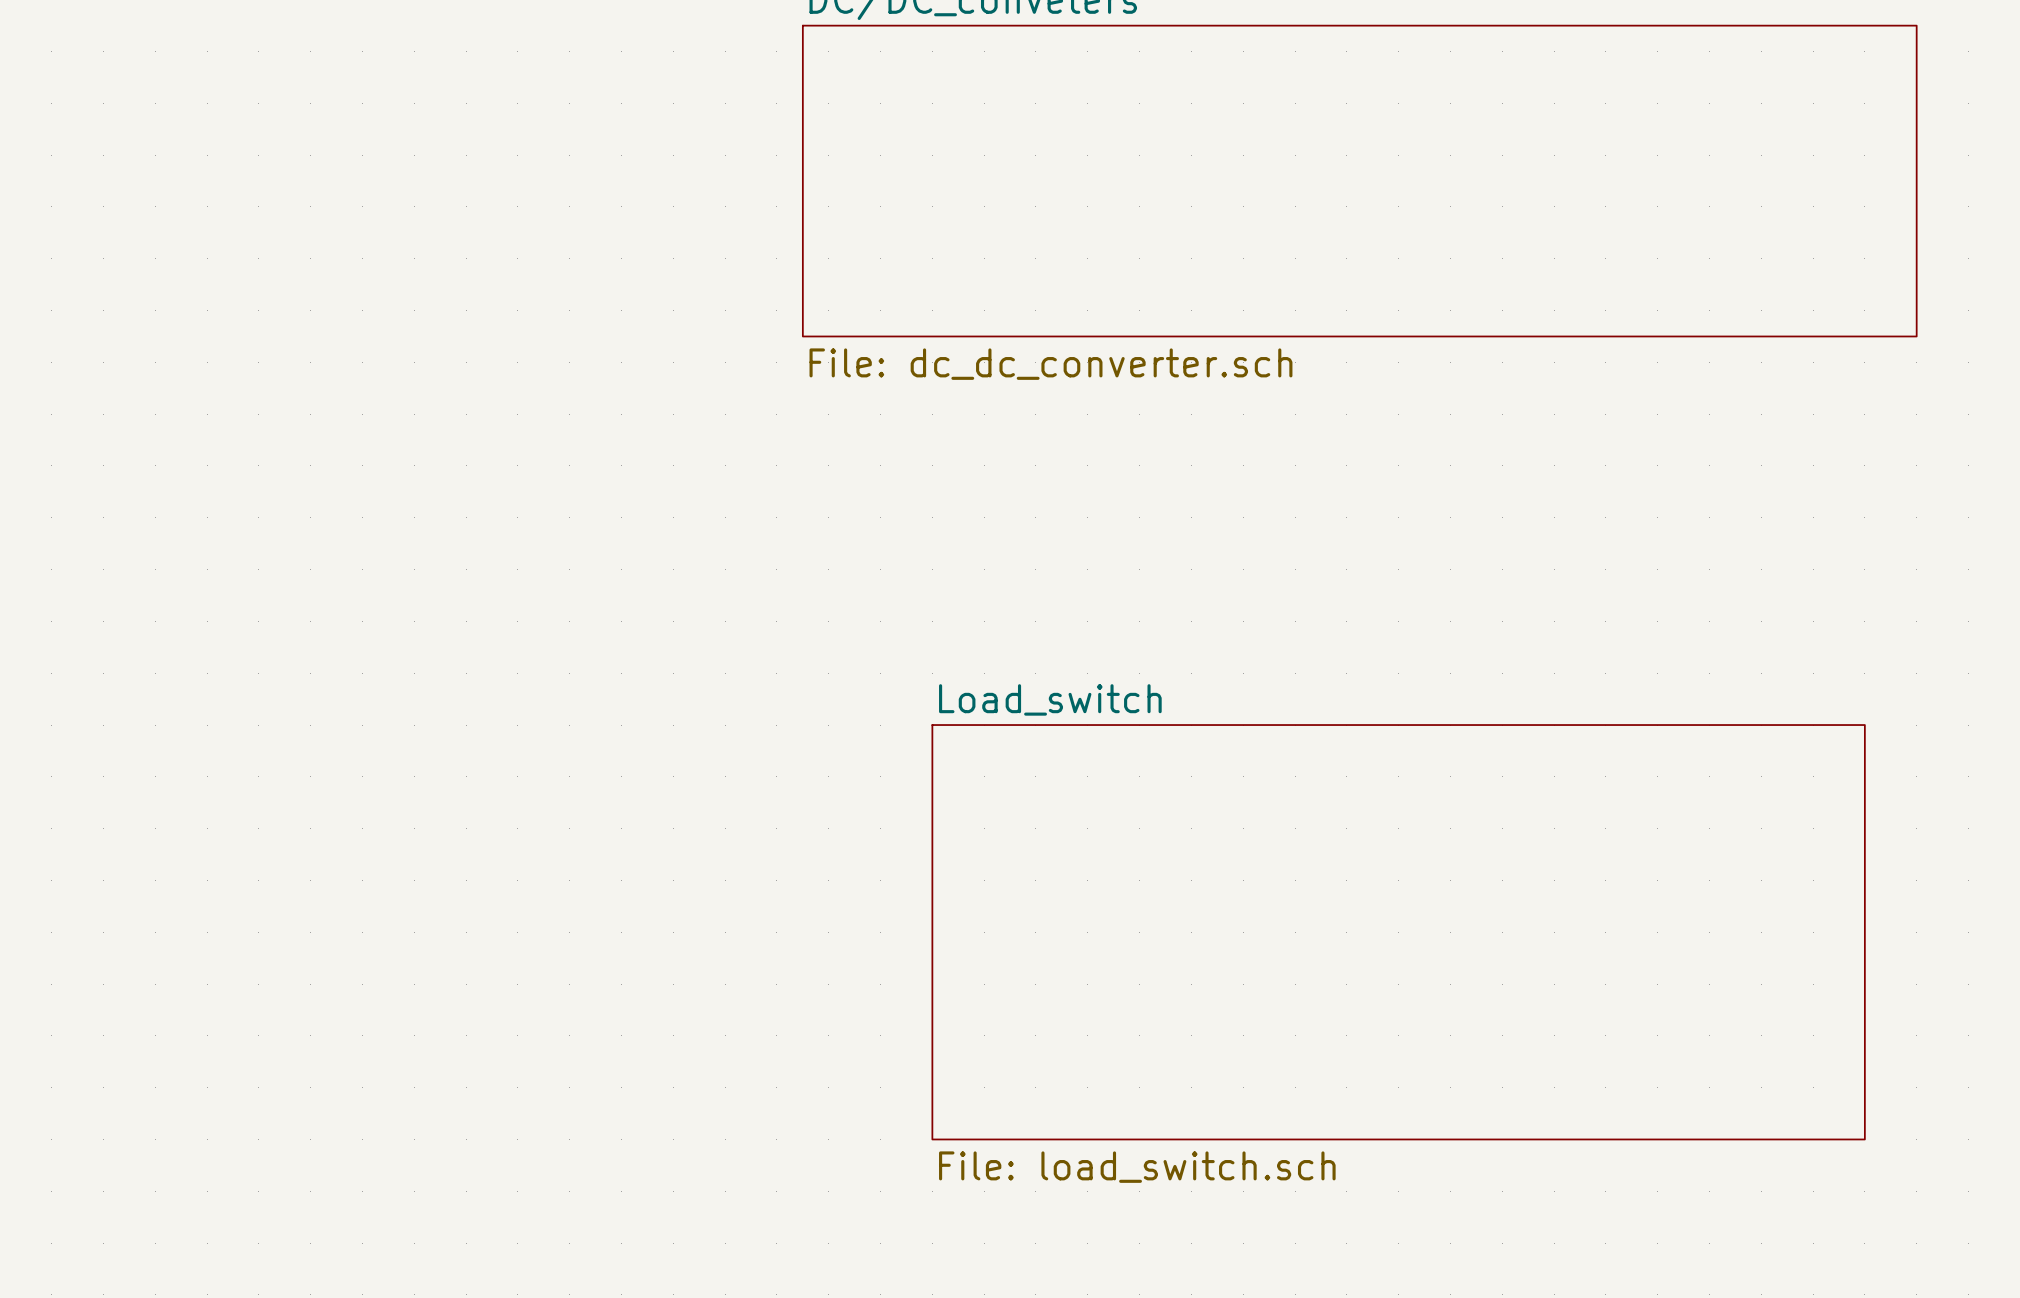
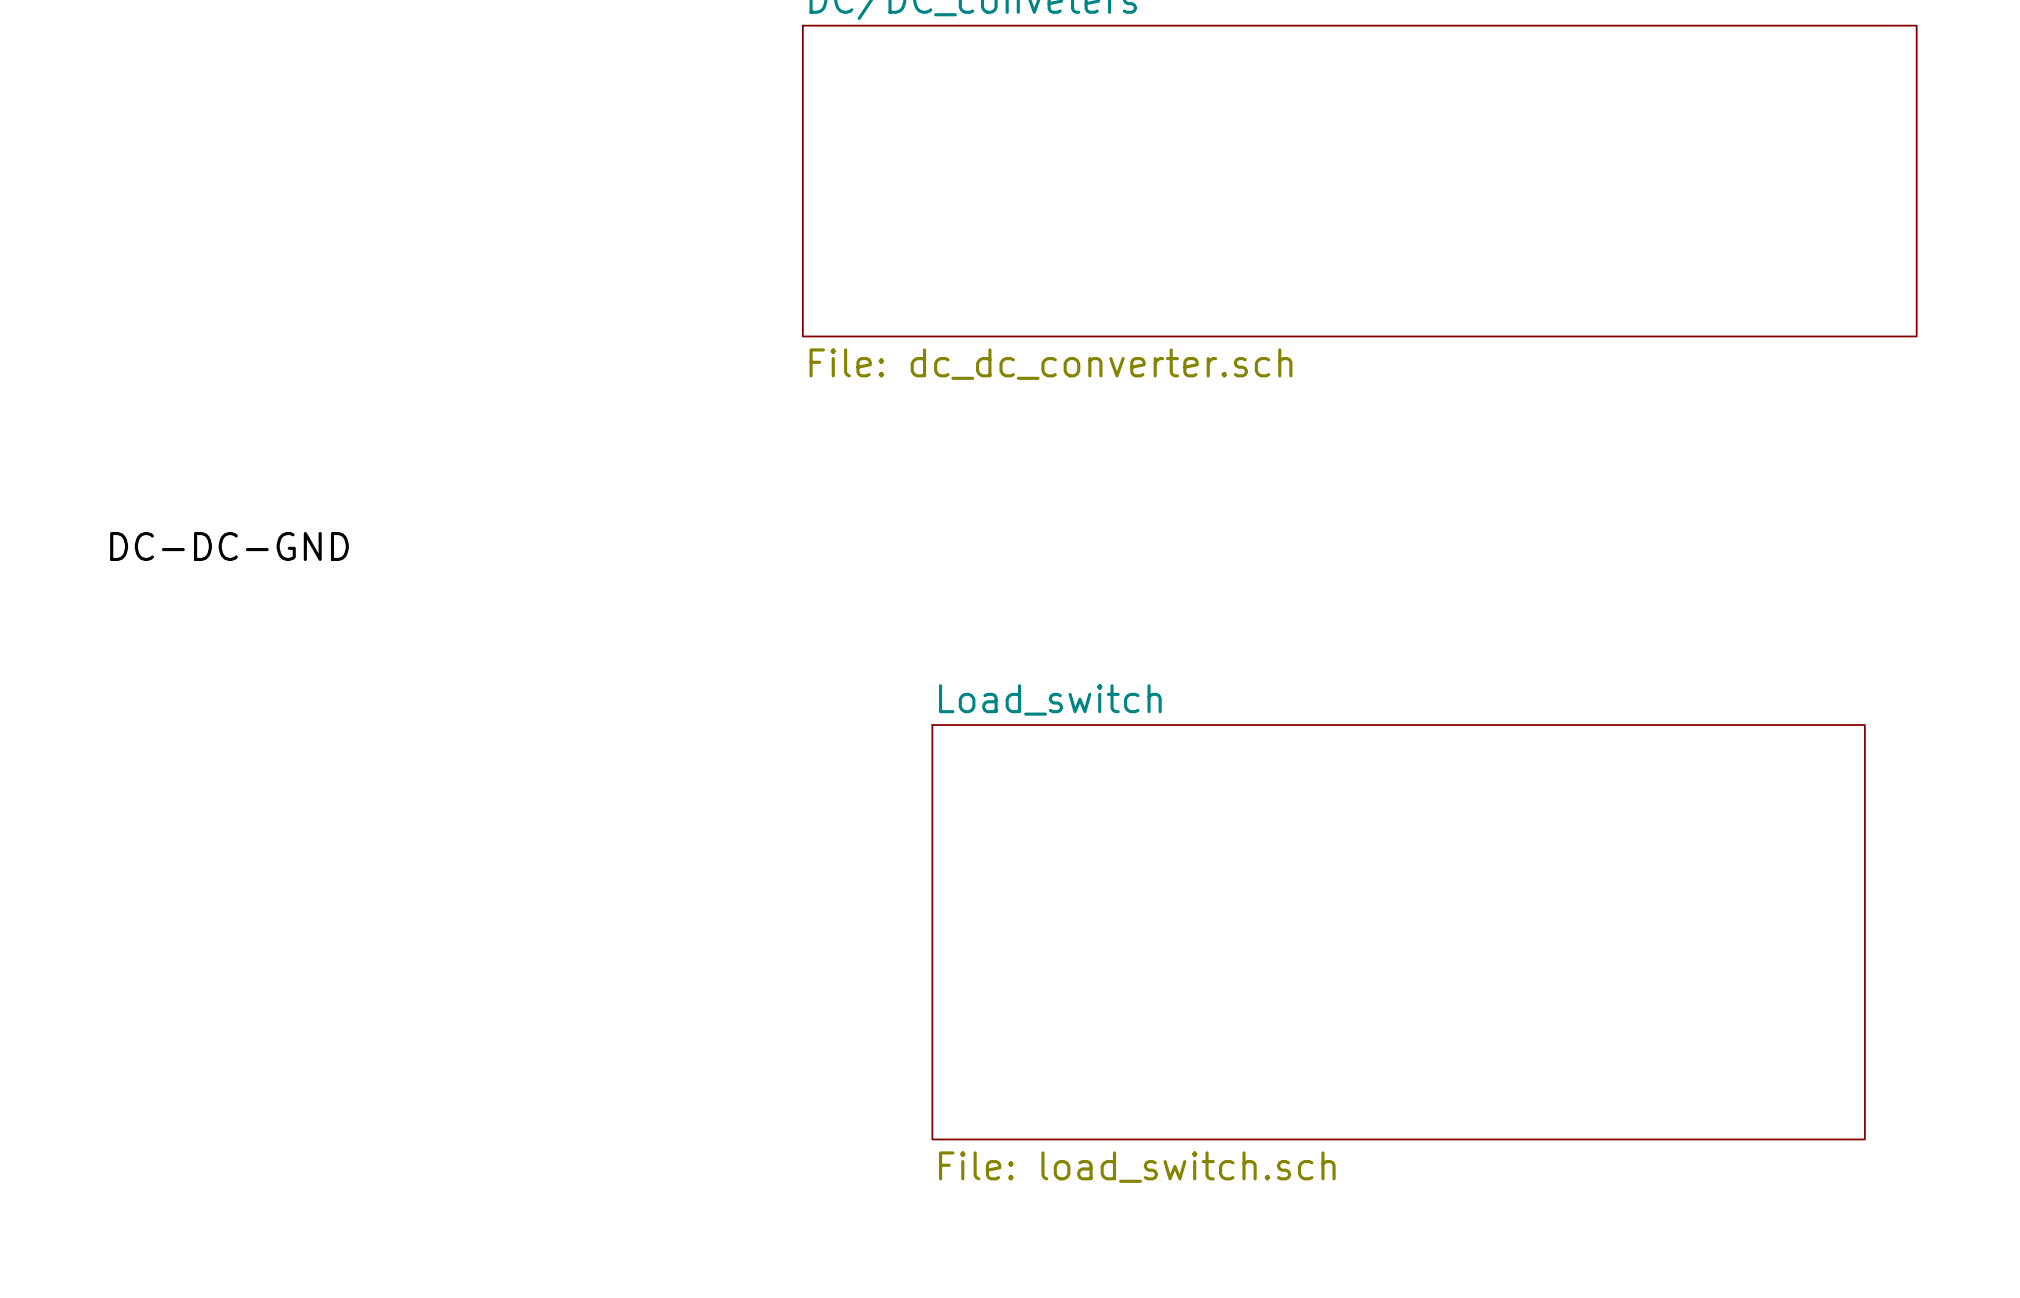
label: none -> DC-DC-GND (229, 546)

